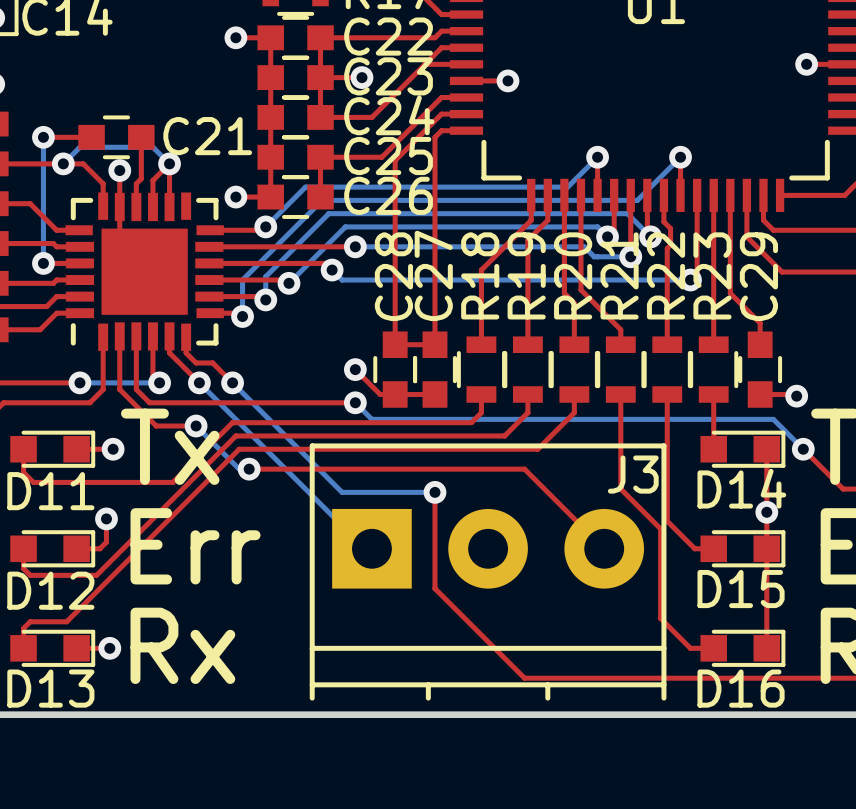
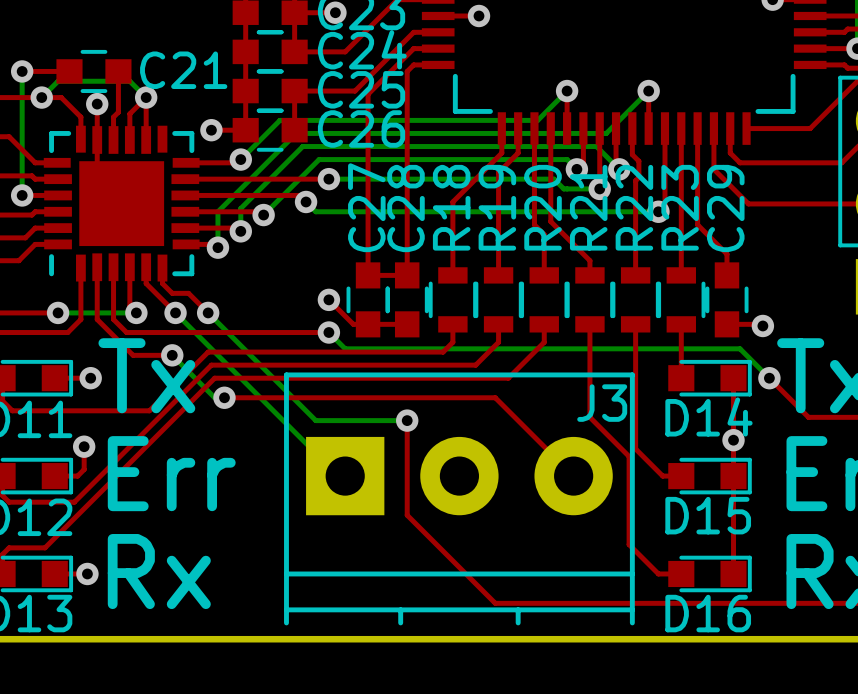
C27 name: C27 (433, 275) -> C28 (405, 208)
C28 name: C28 (393, 276) -> C27 (366, 207)

